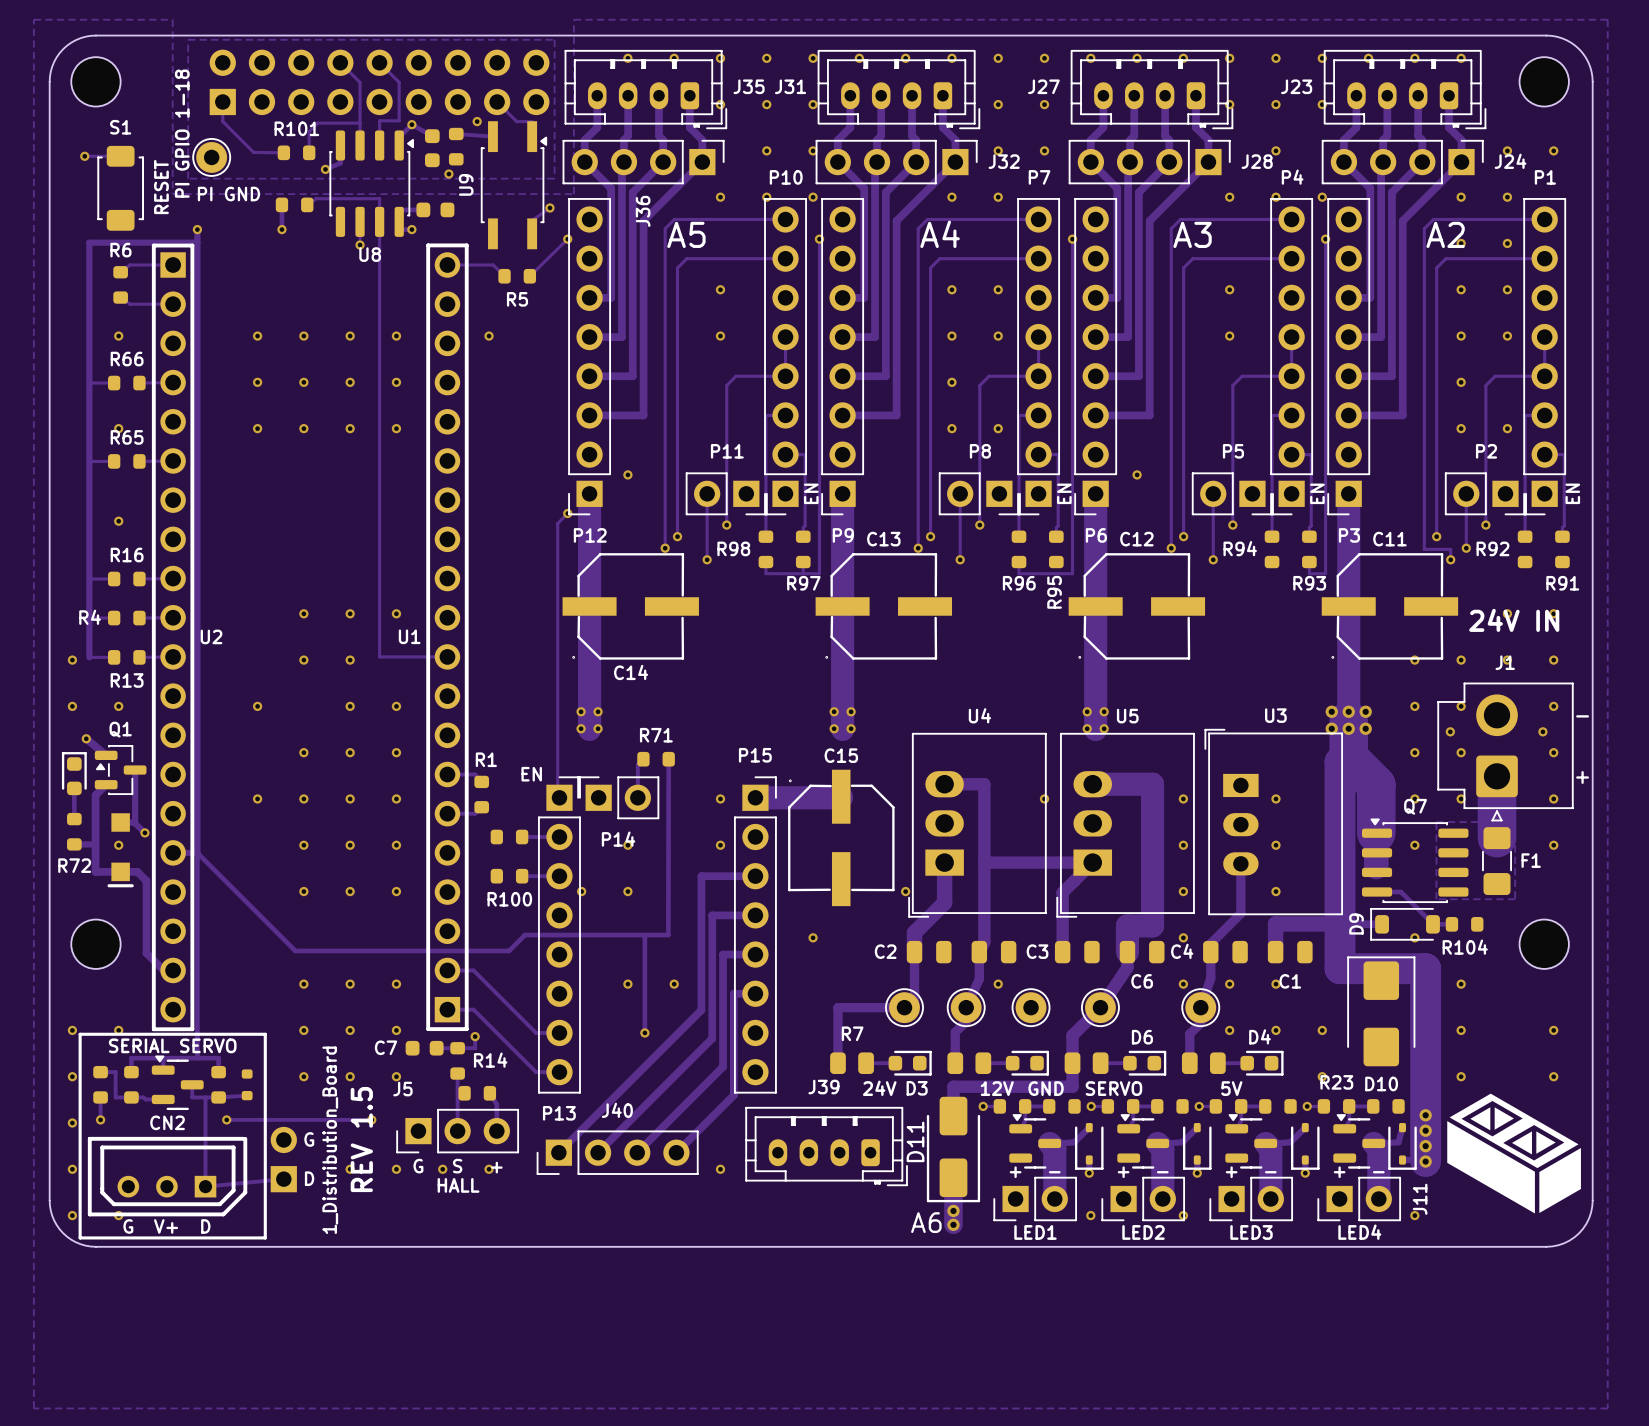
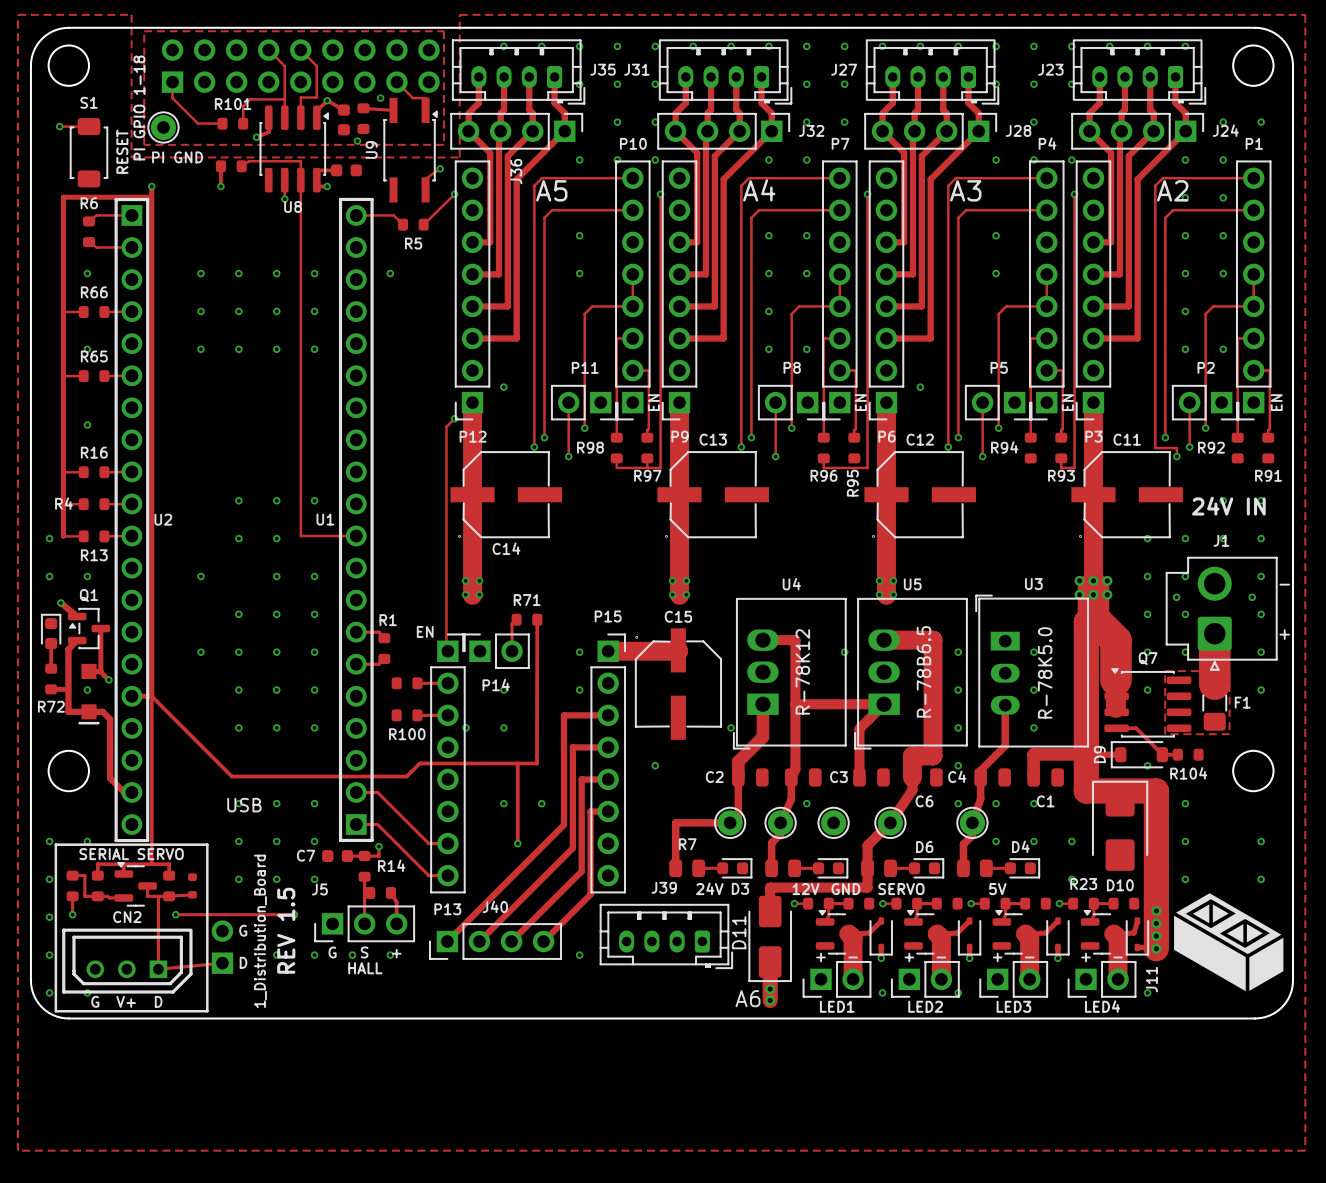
text: none -> R-78K12 (802, 671)
text: none -> R-78B6.5 (924, 671)
text: none -> R-78K5.0 (1045, 672)
text: none -> USB (244, 805)

